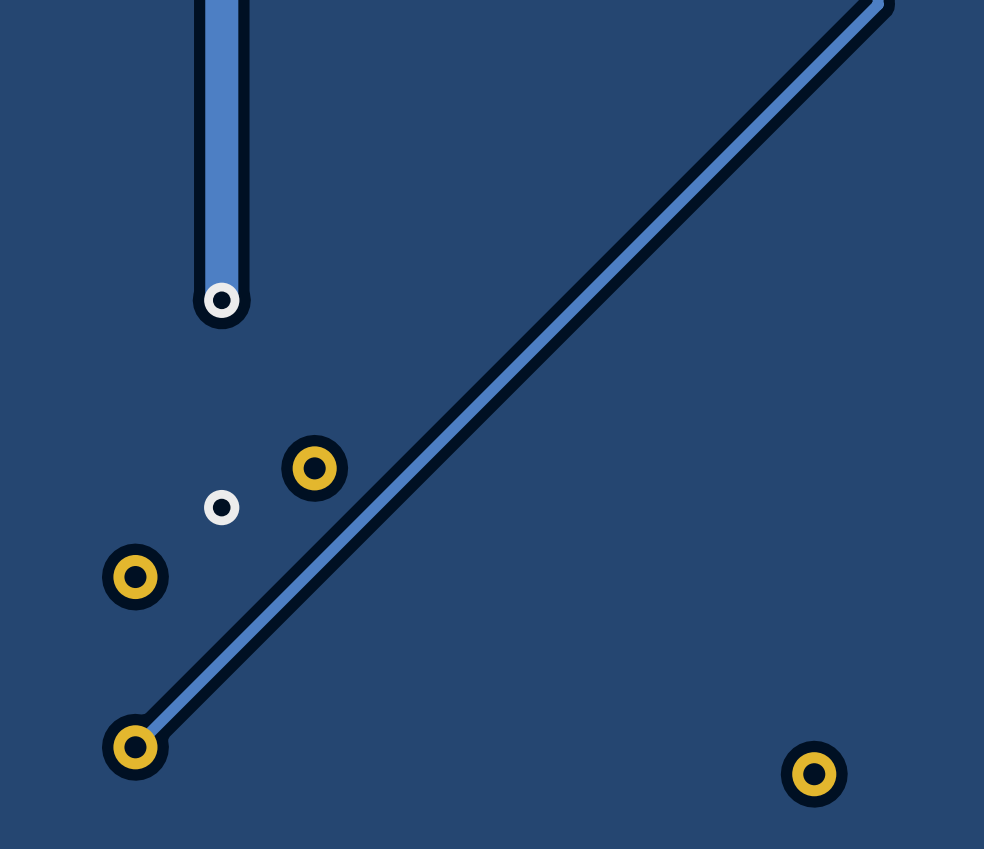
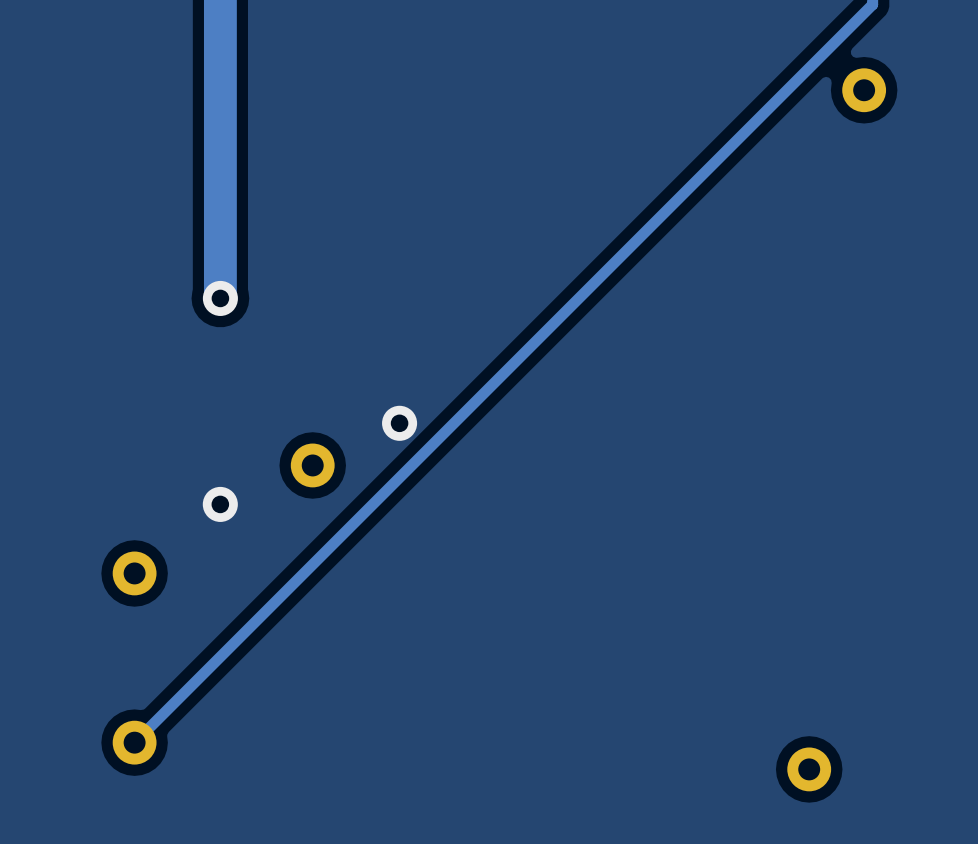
part: none -> (864, 90)
via: none -> (399, 423)

